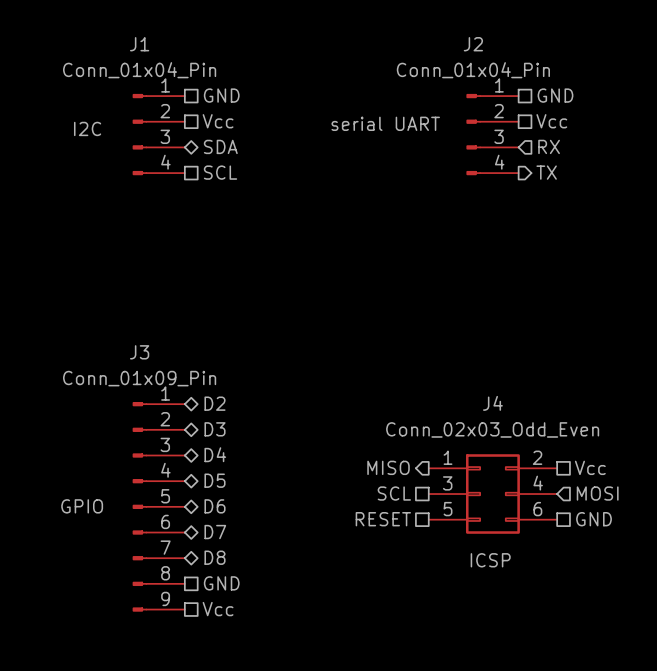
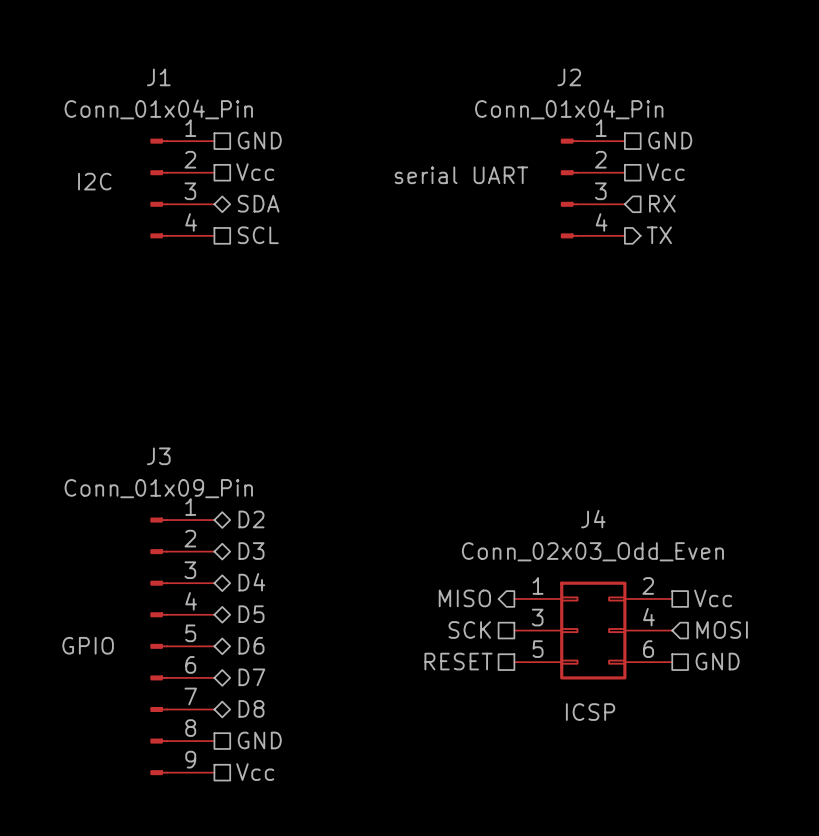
hierarchical label: SCL (394, 493) -> SCK (469, 629)

